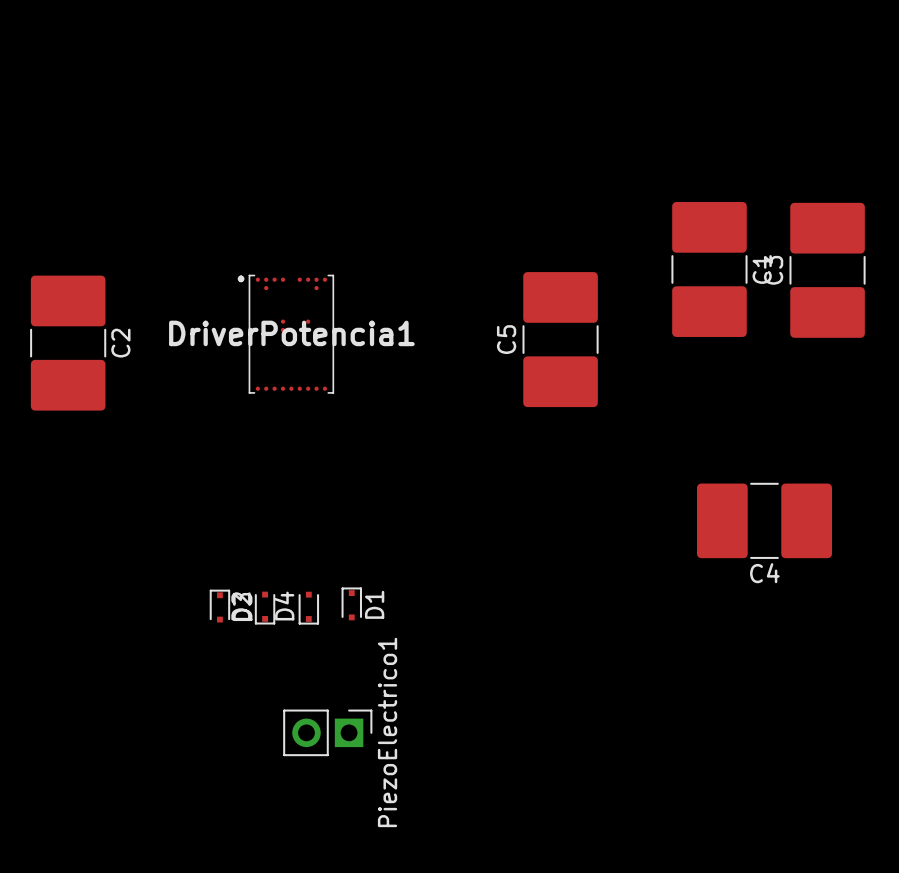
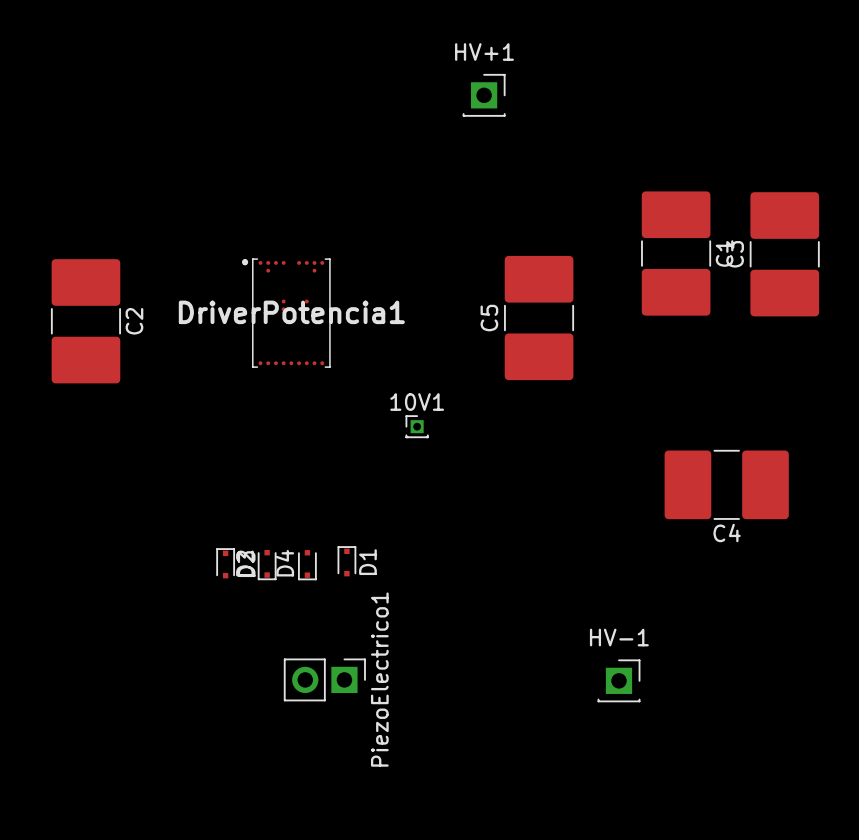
HV+1: none -> (484, 95)
10V1: none -> (417, 426)
HV-1: none -> (618, 680)

